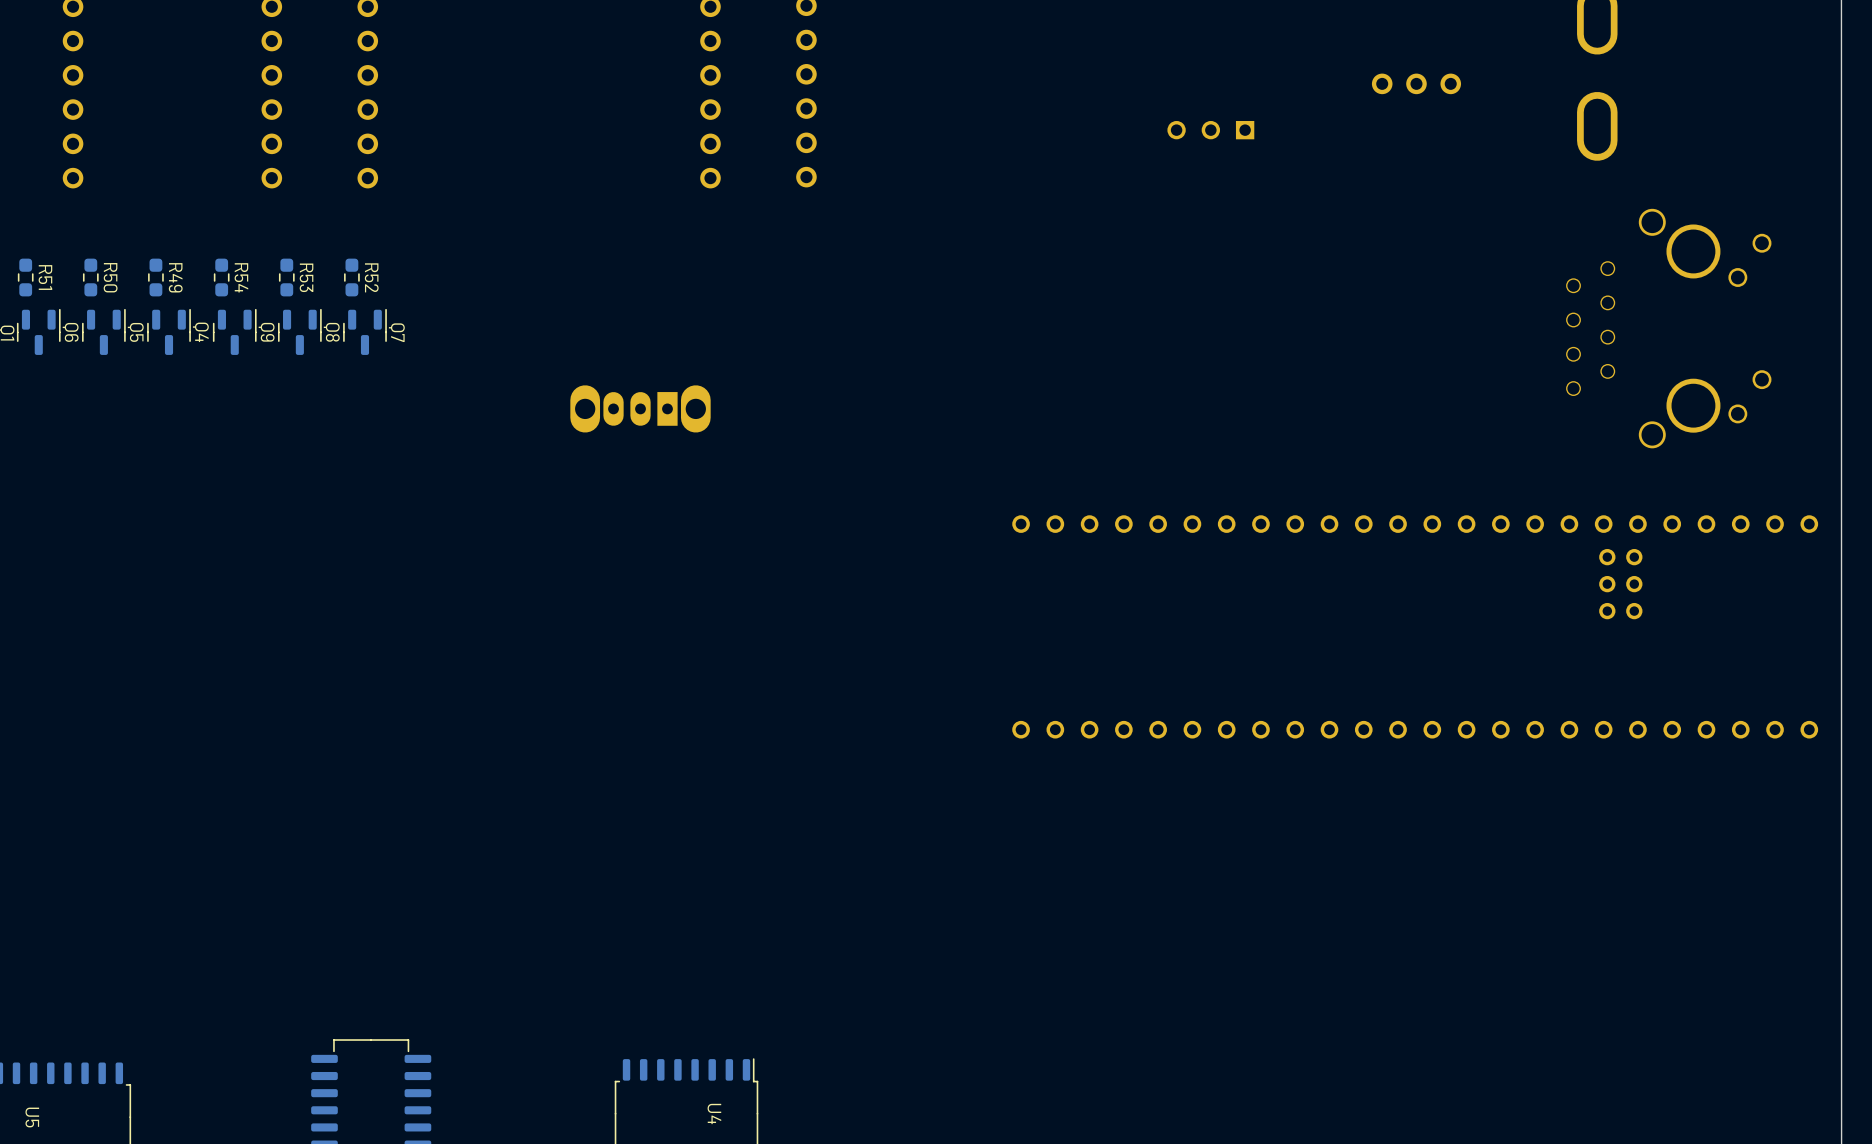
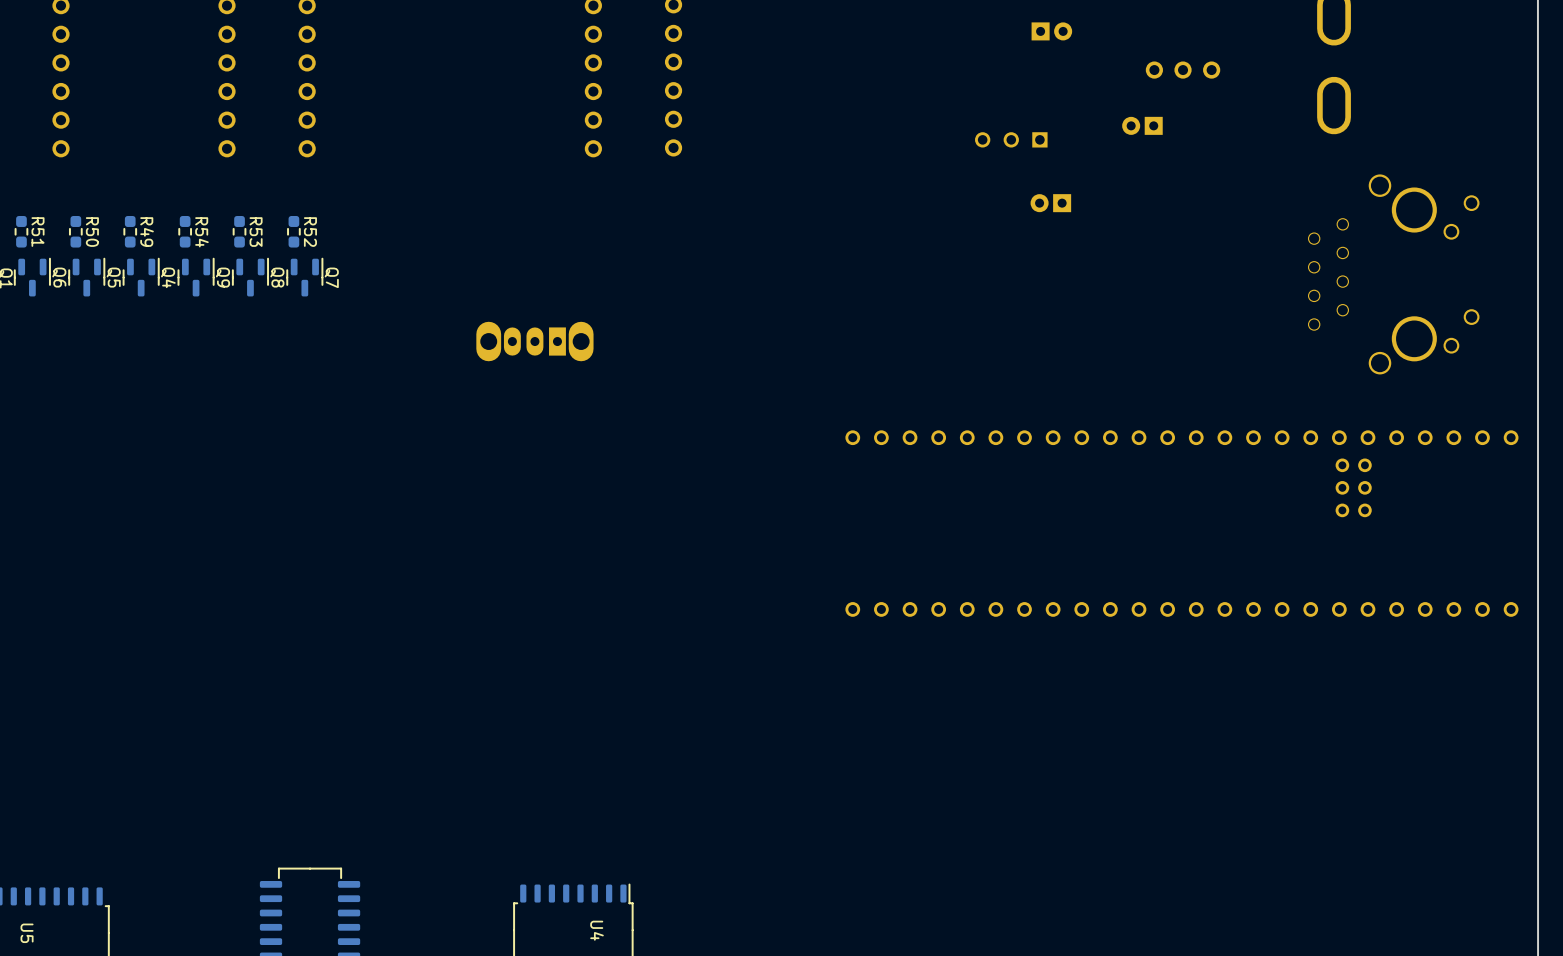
part: none -> (1051, 31)
part position: (1210, 130) -> (1011, 139)
part: none -> (1142, 125)
part: none -> (1050, 203)

